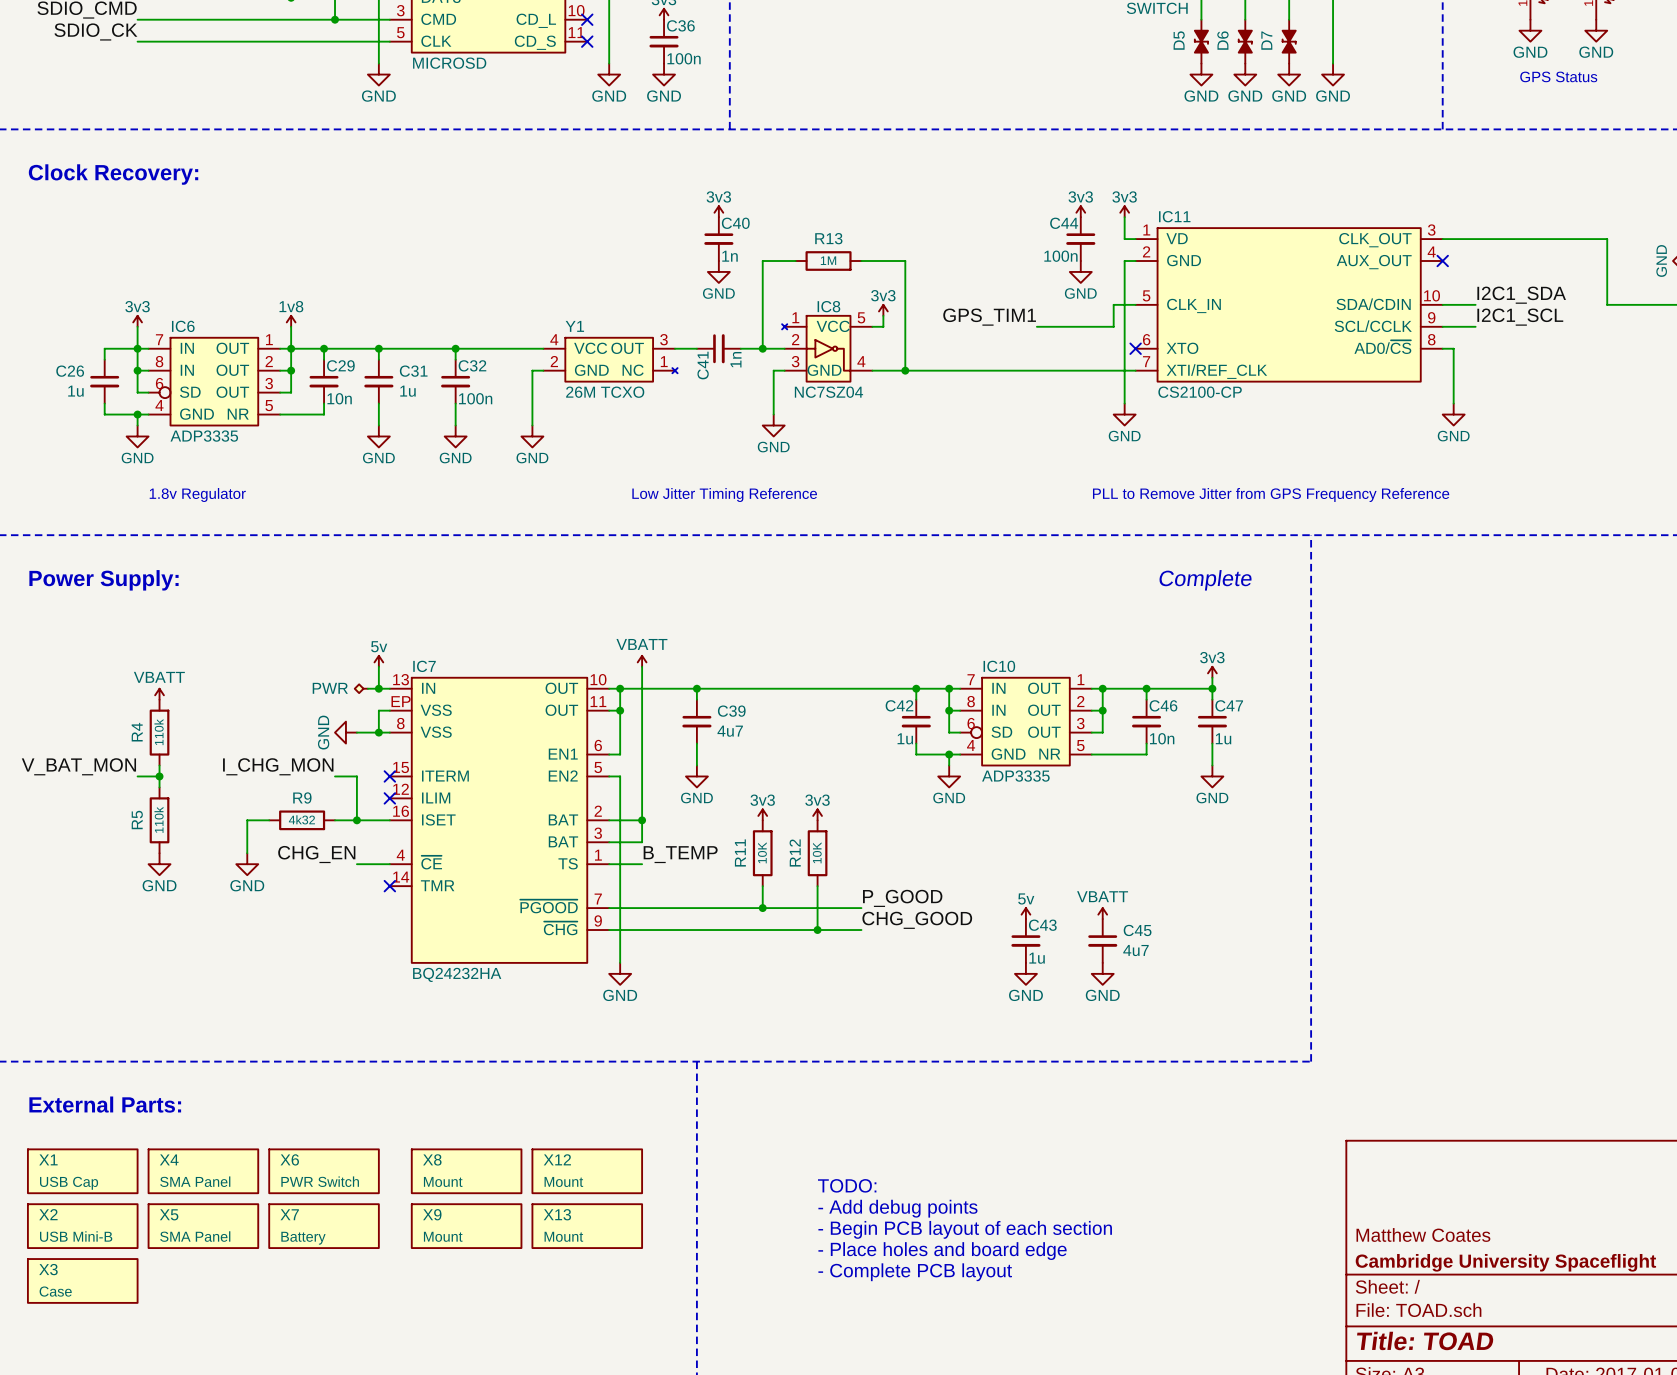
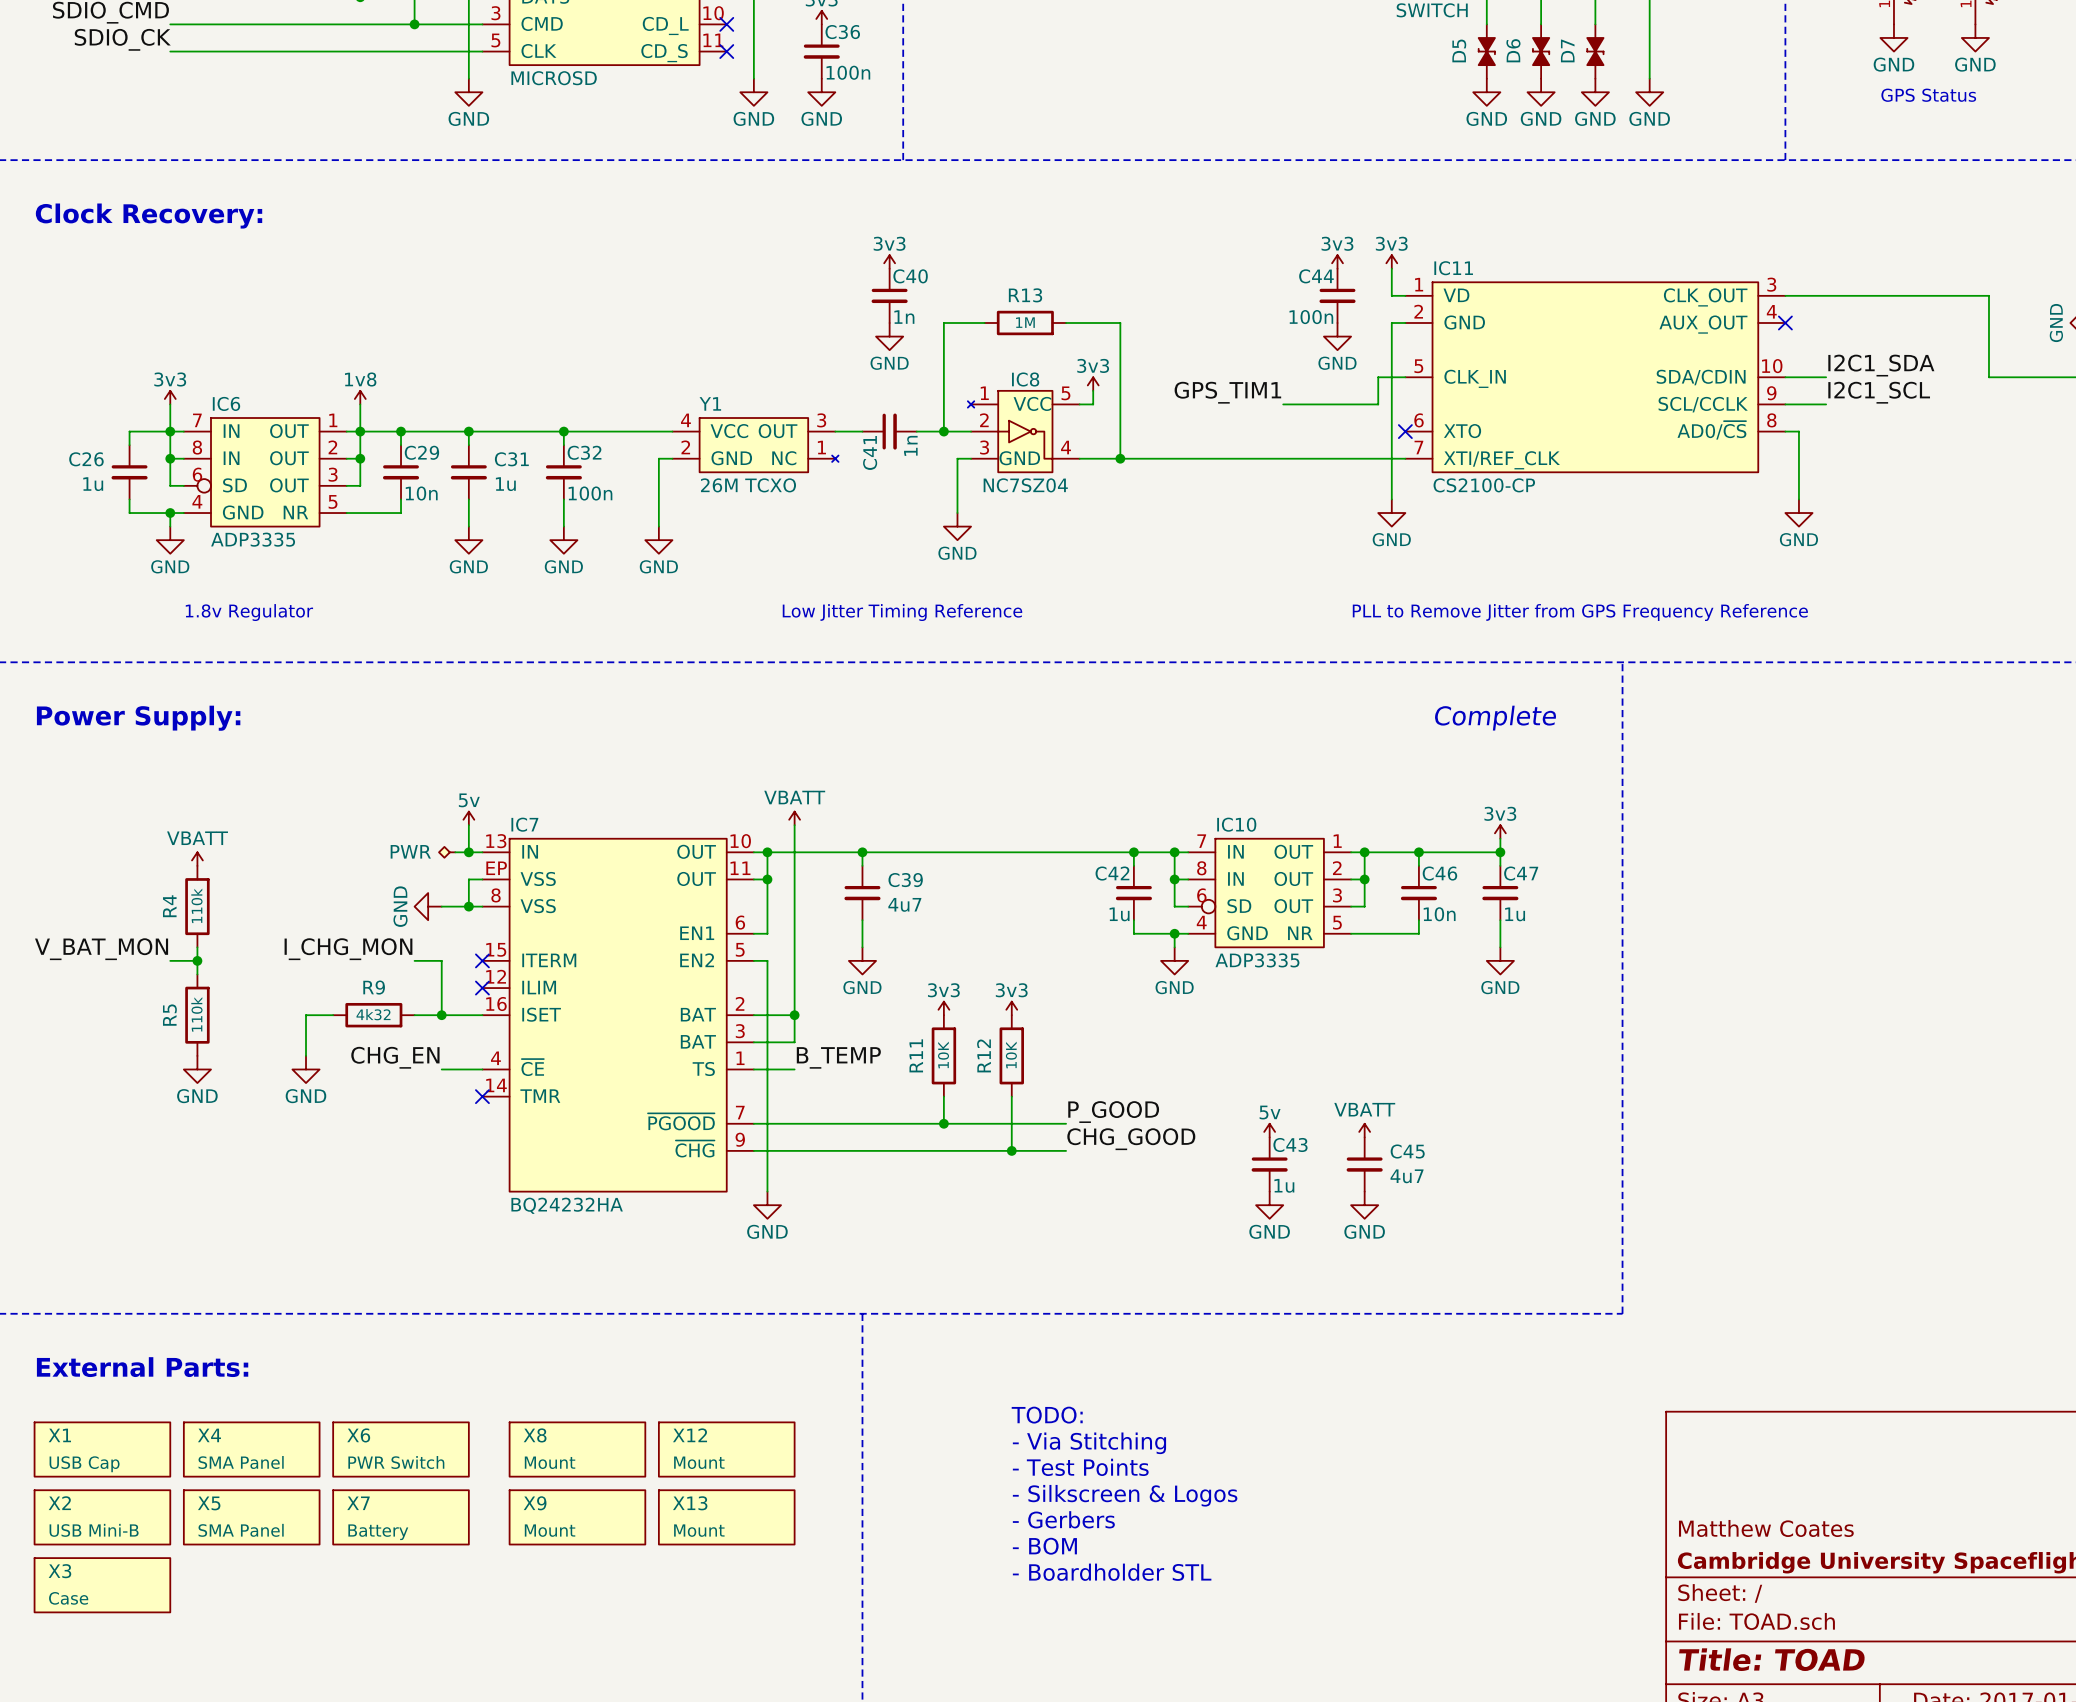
text: none -> TODO: (1047, 1415)
text: none -> - Via Stitching (1089, 1443)
text: TODO: (847, 1185) -> - Test Points (1080, 1467)
text: - Add debug points (897, 1208) -> - Silkscreen & Logos (1125, 1495)
text: - Begin PCB layout of each section (965, 1229) -> - Gerbers (1063, 1519)
text: - Place holes and board edge (942, 1251) -> - BOM (1044, 1546)
text: - Complete PCB layout (915, 1272) -> - Boardholder STL (1112, 1572)

